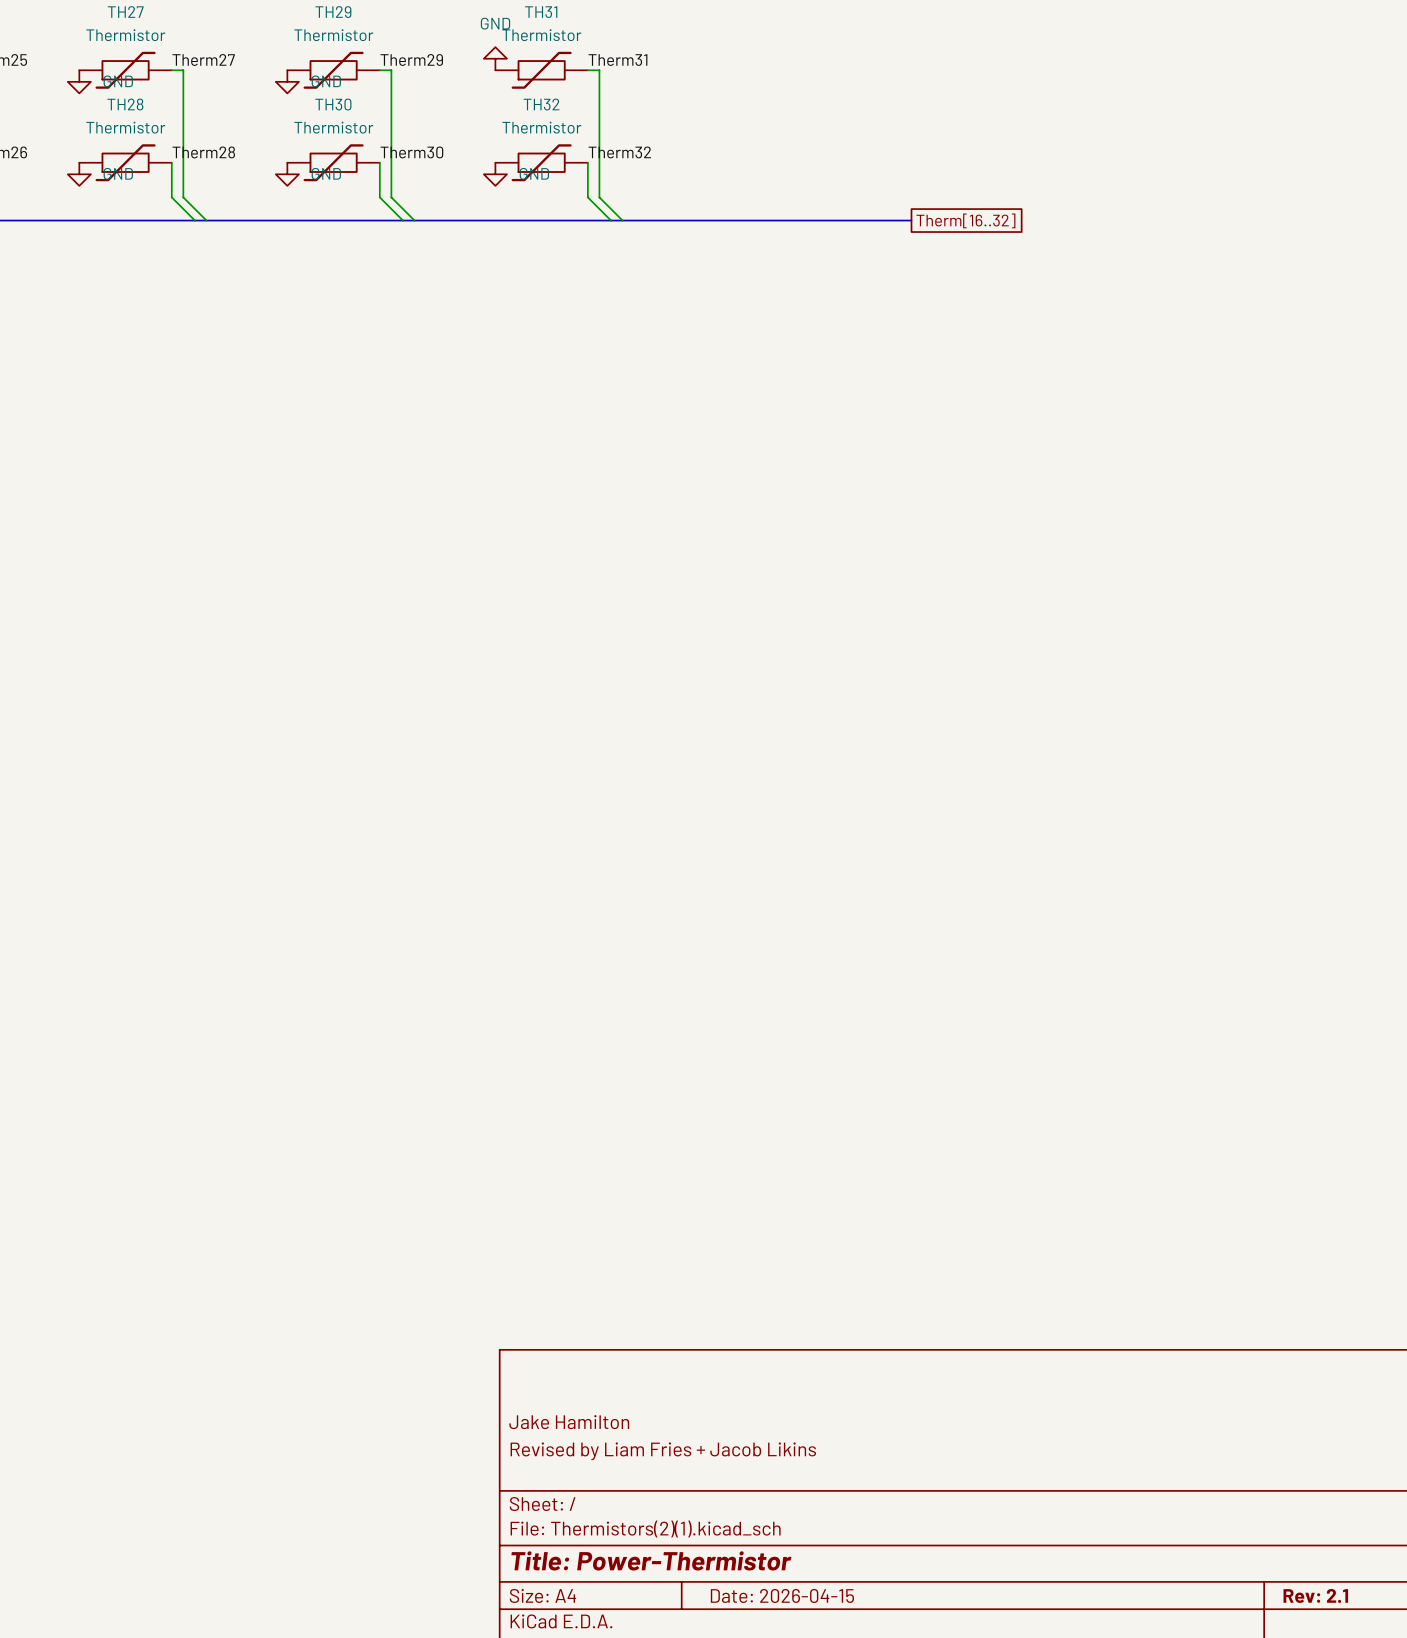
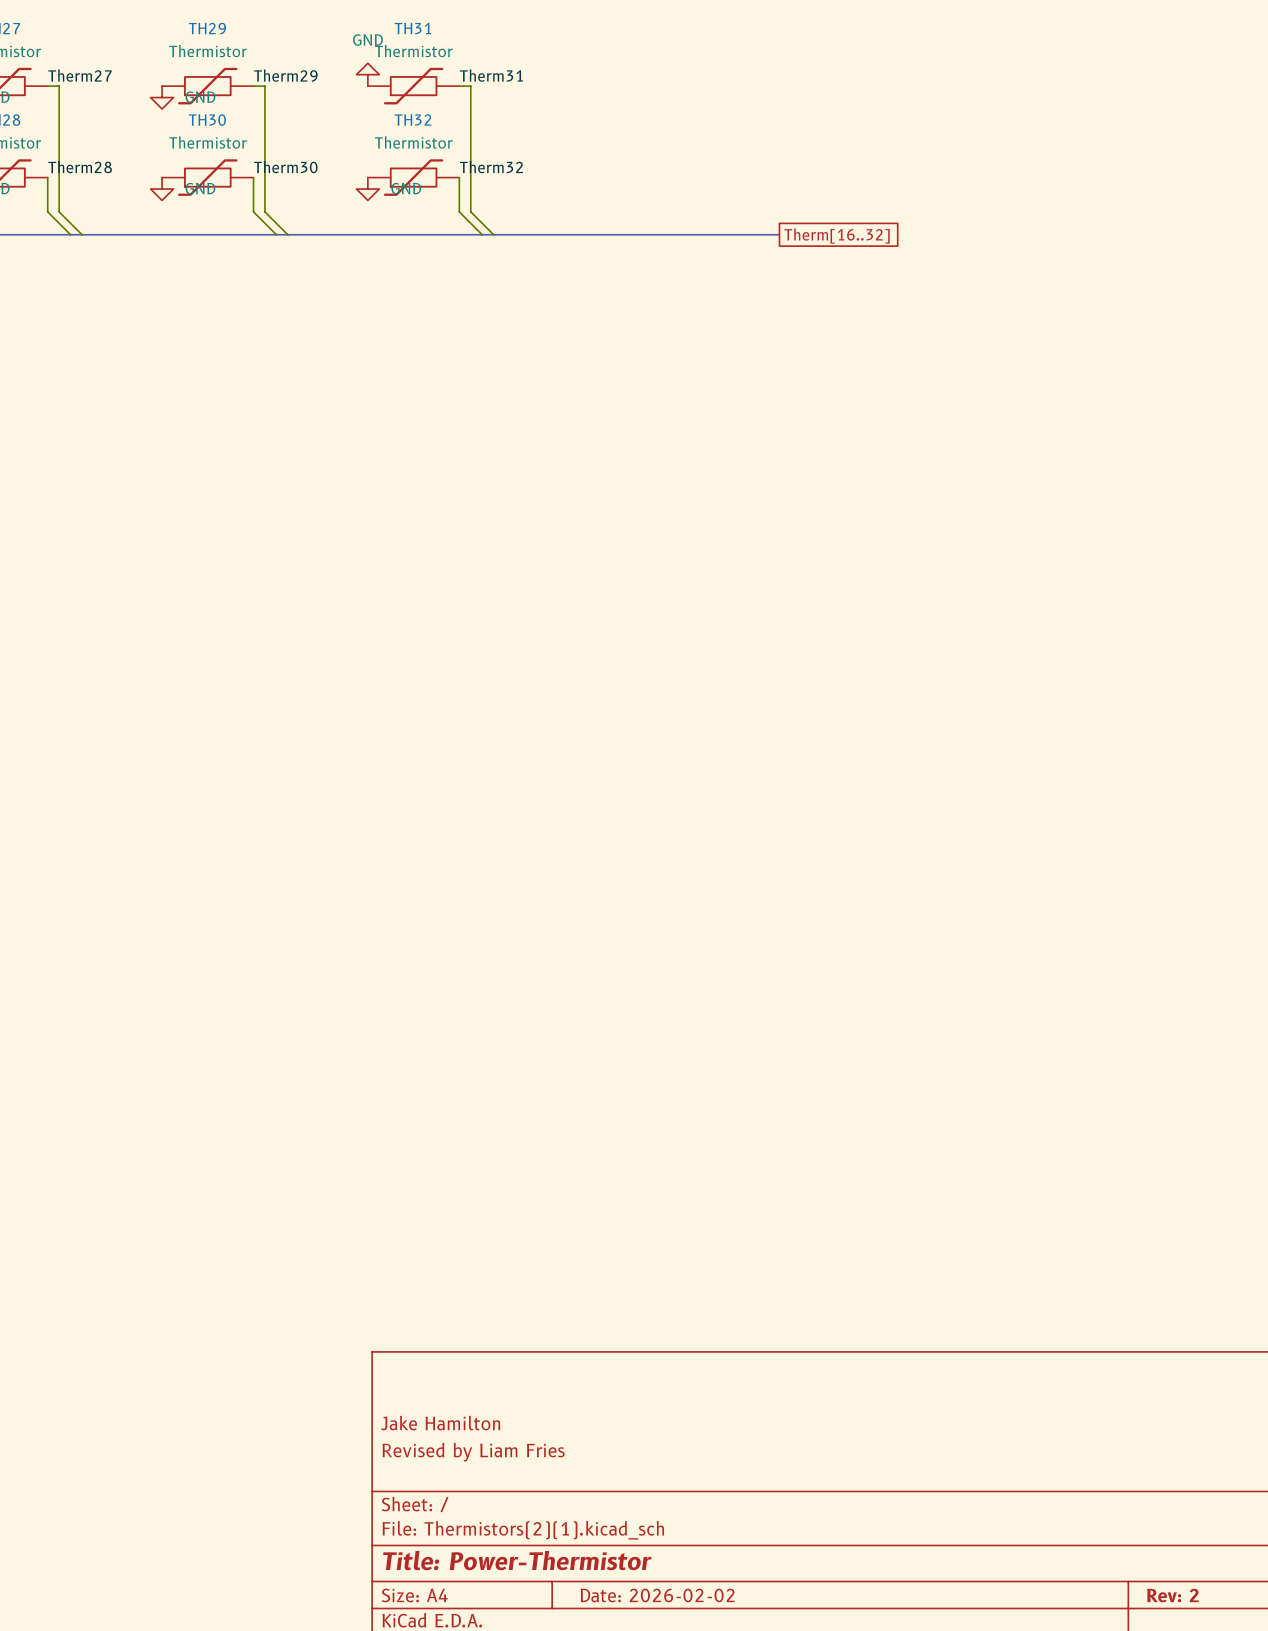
title block: Revised by Liam Fries + Jacob Likins (663, 1451) -> Revised by Liam Fries (473, 1452)
title block: Date: 2026-04-15 (782, 1595) -> Date: 2026-02-02 (657, 1595)
title block: Rev: 2.1 (1315, 1595) -> Rev: 2 (1172, 1595)

